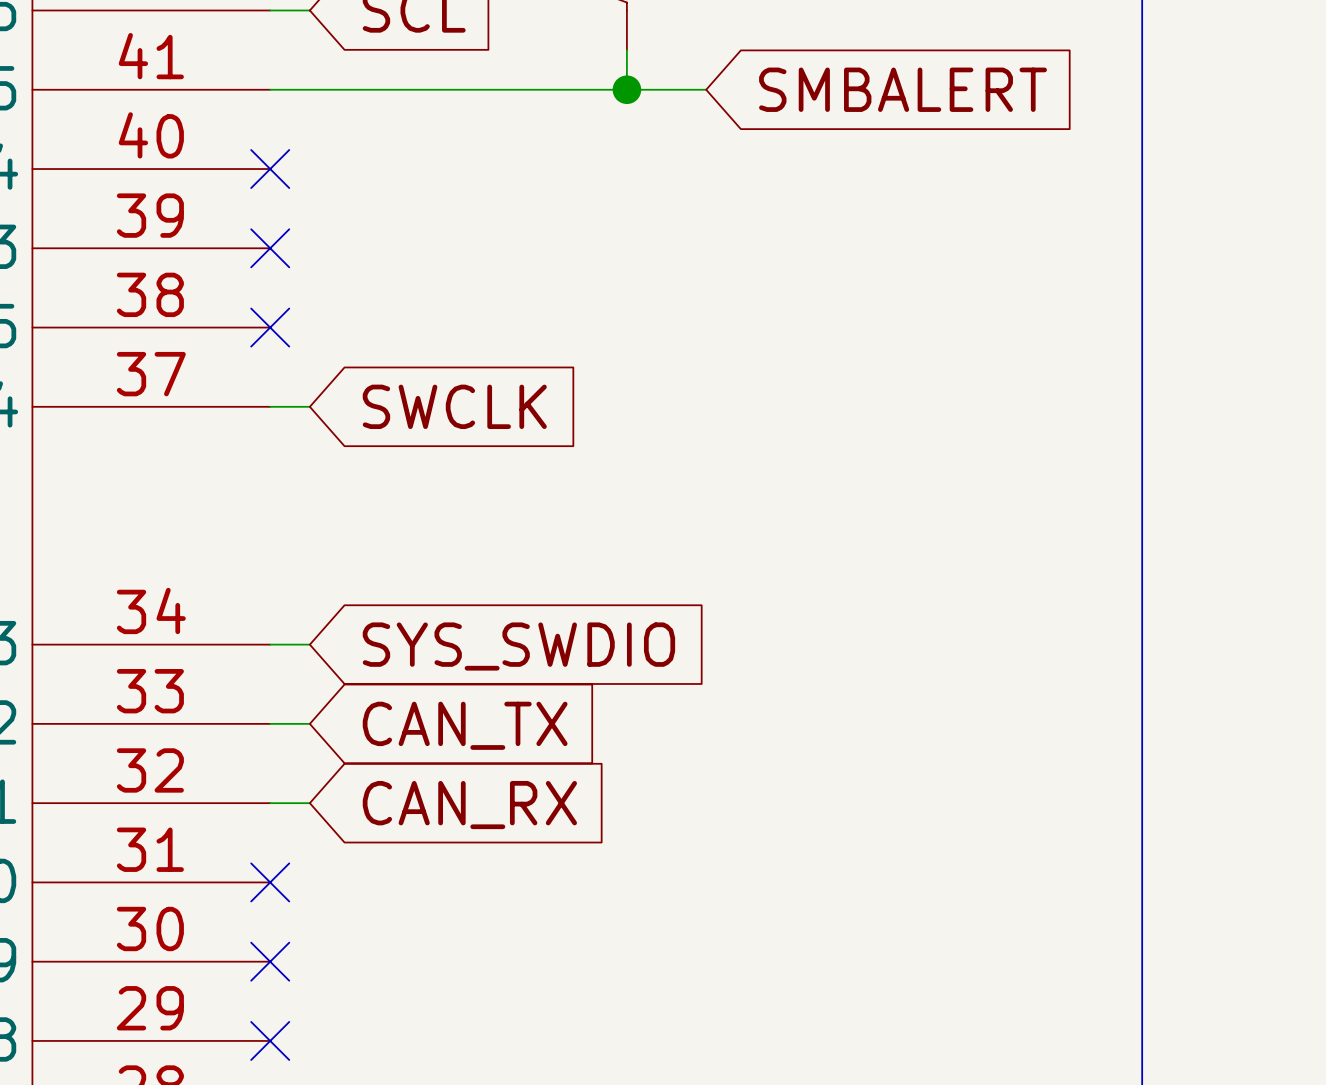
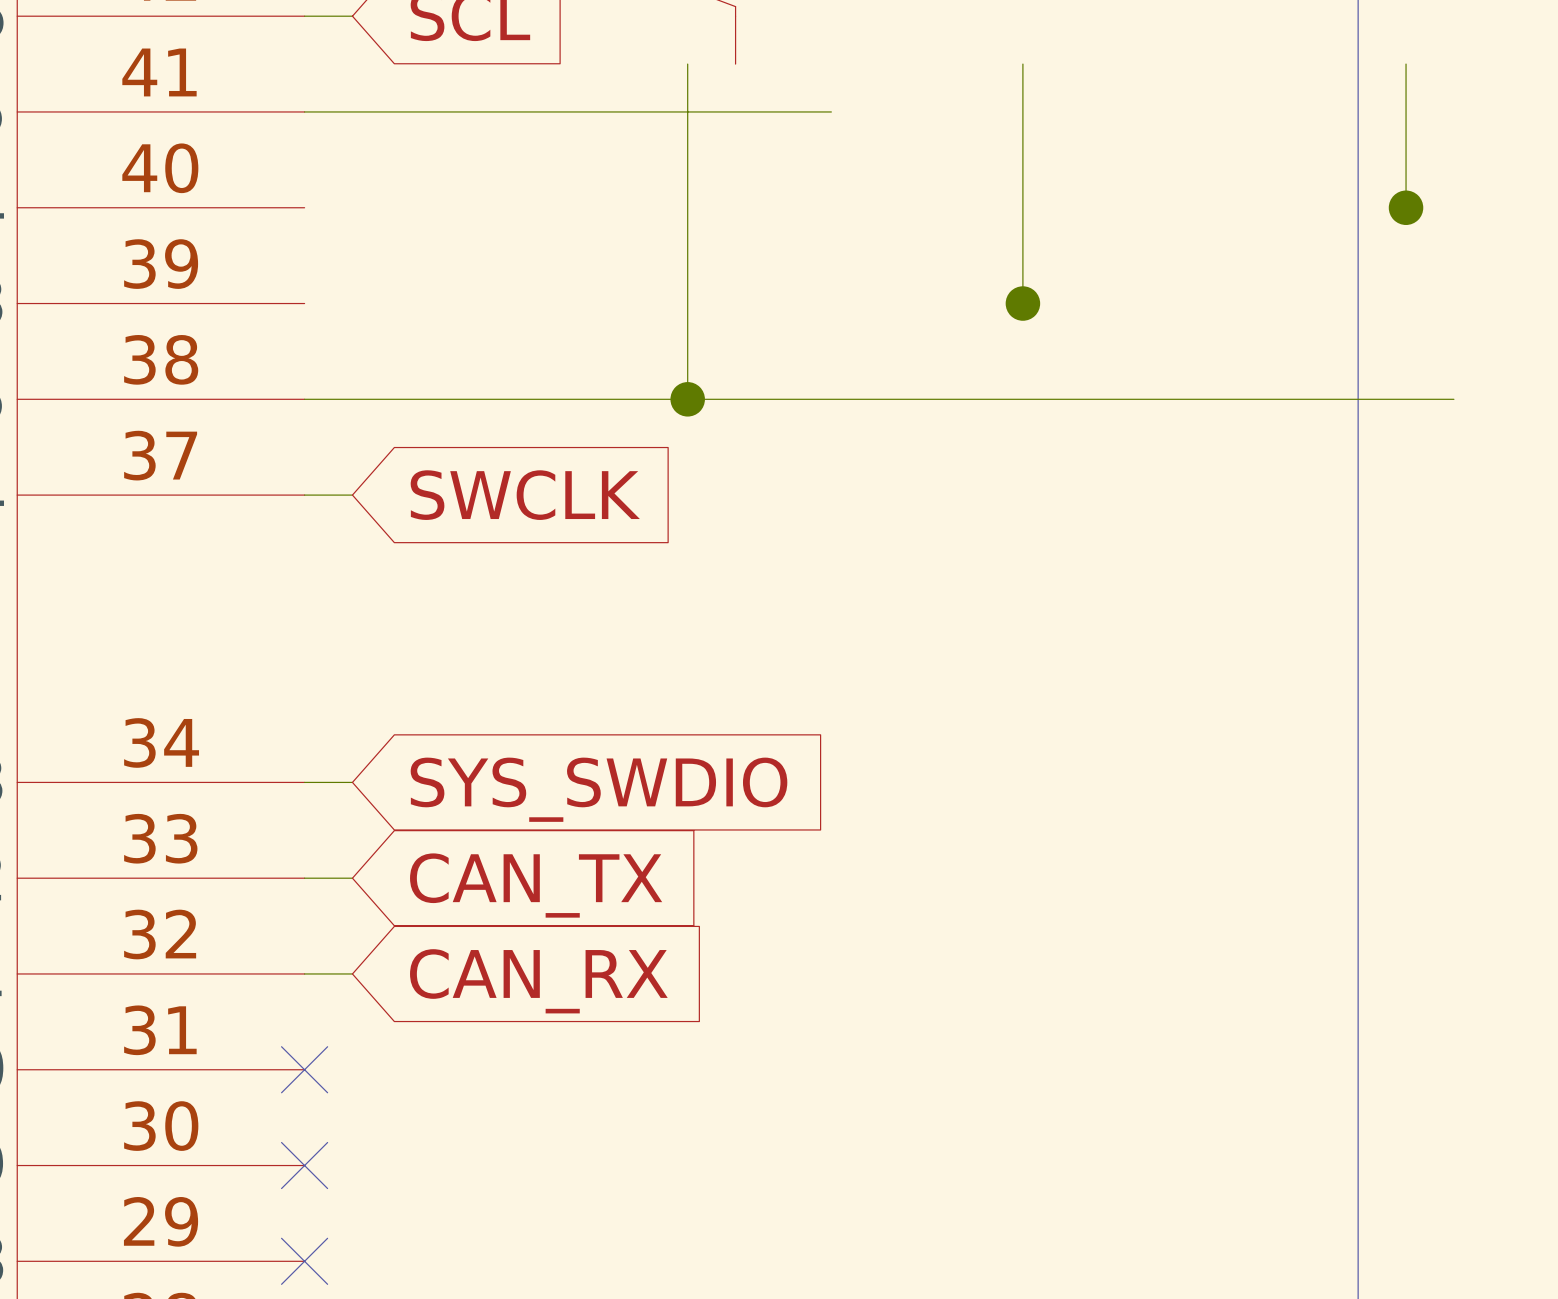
wire: none -> (687, 64) (687, 399)
wire: (626, 50) (626, 89) -> none
wire: none -> (1022, 64) (1022, 303)
wire: none -> (1406, 64) (1406, 207)
junction: (626, 89) -> none
global label: SMBALERT (903, 89) -> none
no-connect mark: (270, 169) -> none
junction: none -> (1406, 207)
no-connect mark: (270, 248) -> none
junction: none -> (1022, 303)
wire: none -> (304, 399) (1453, 399)
no-connect mark: (270, 327) -> none
junction: none -> (687, 399)

